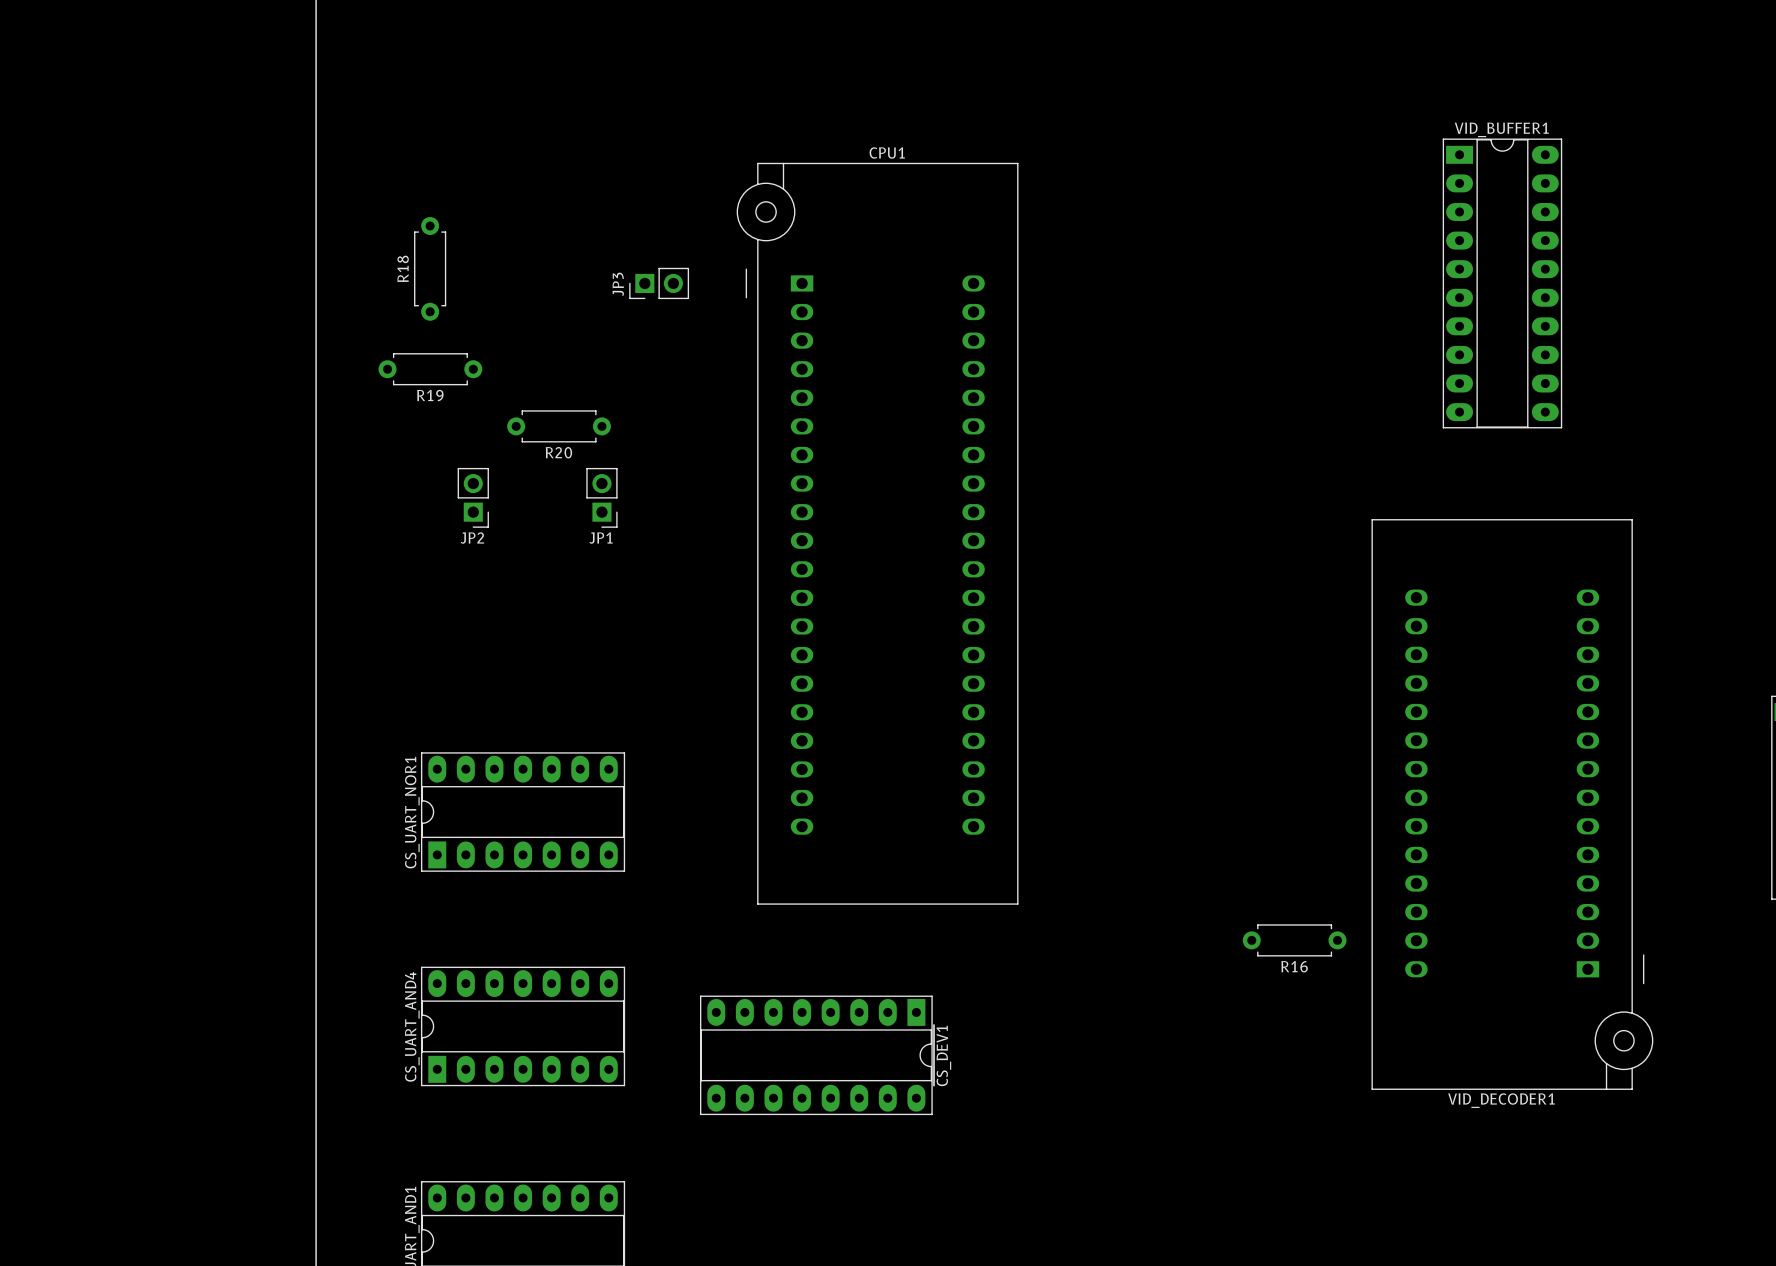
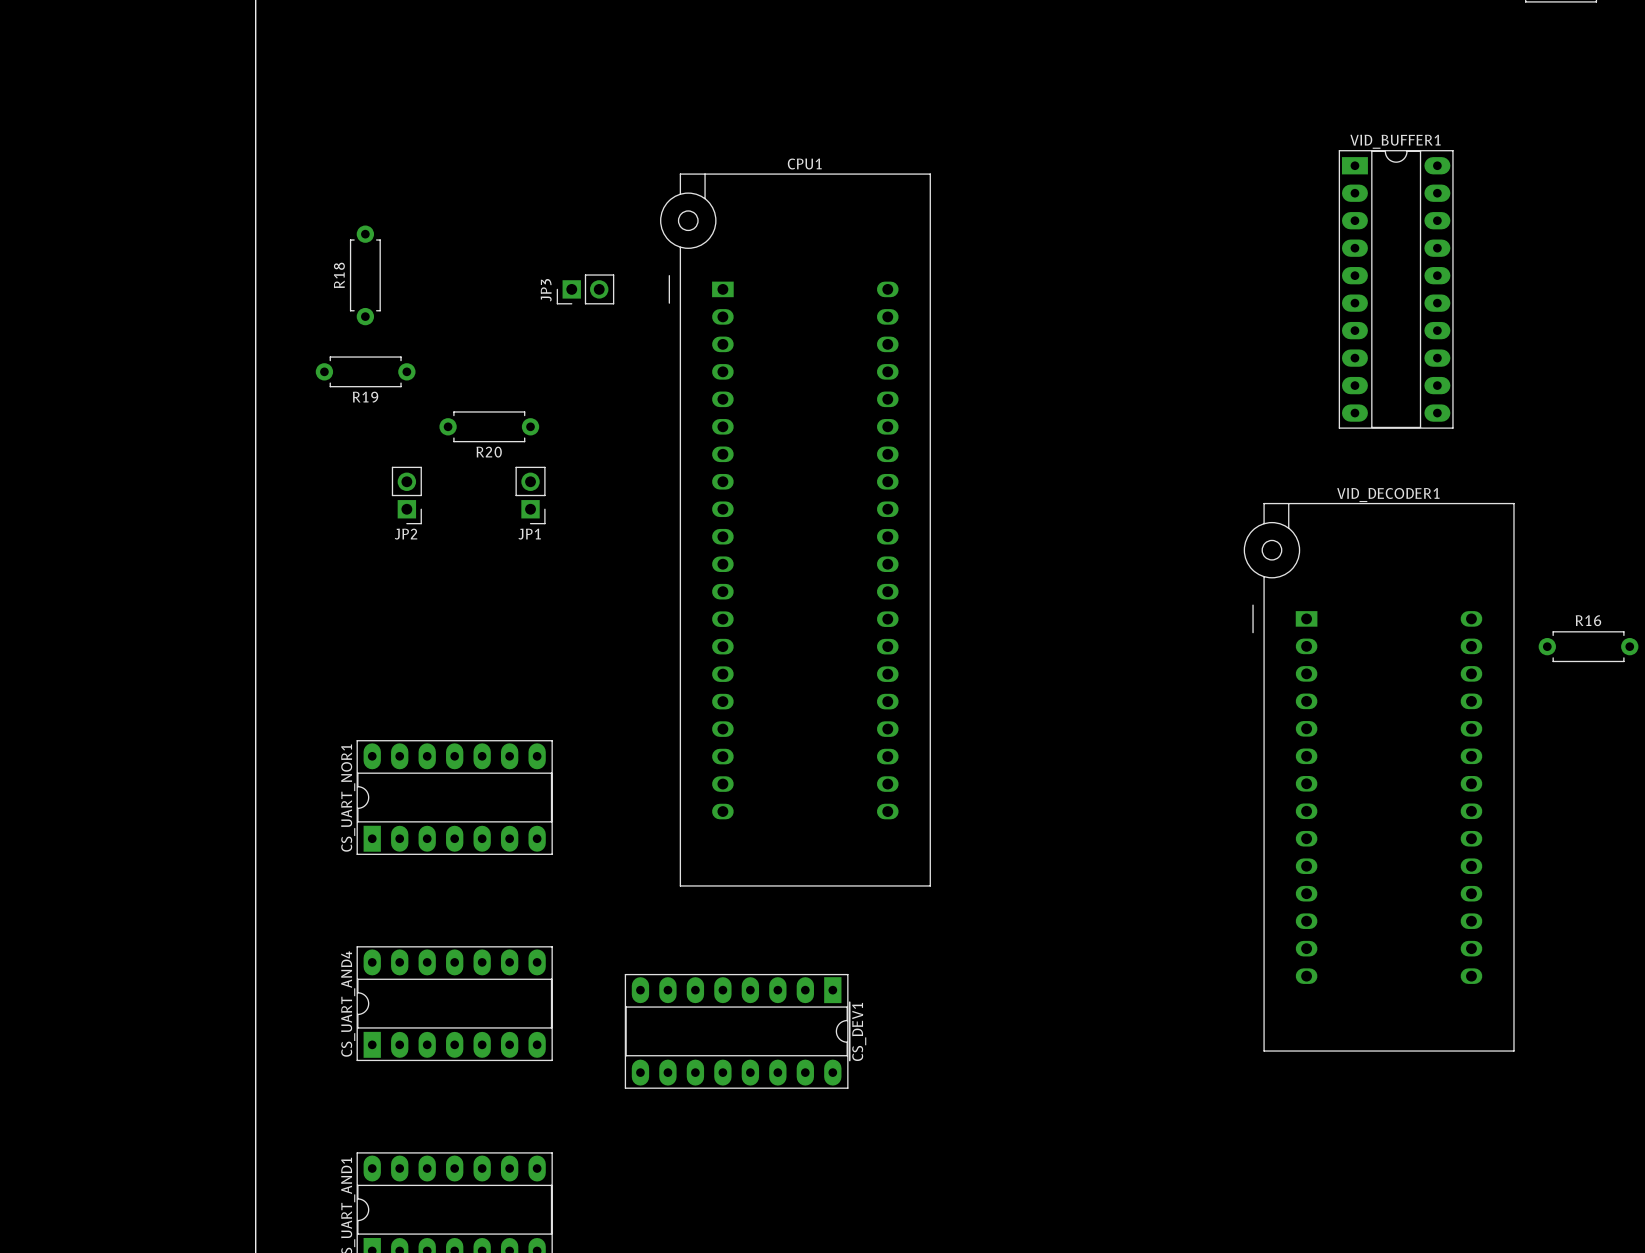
VID_DECODER1 rotation: 0° (1512, 804) -> 180° (1379, 777)
R16 position: (1294, 940) -> (1588, 646)
R16 name position: R16 (1294, 966) -> R16 (1588, 620)

